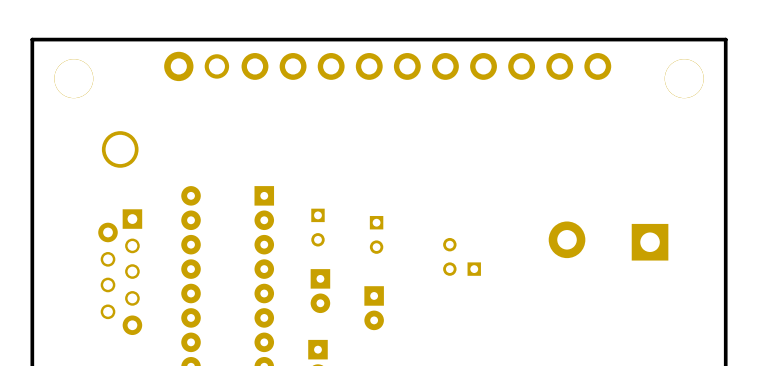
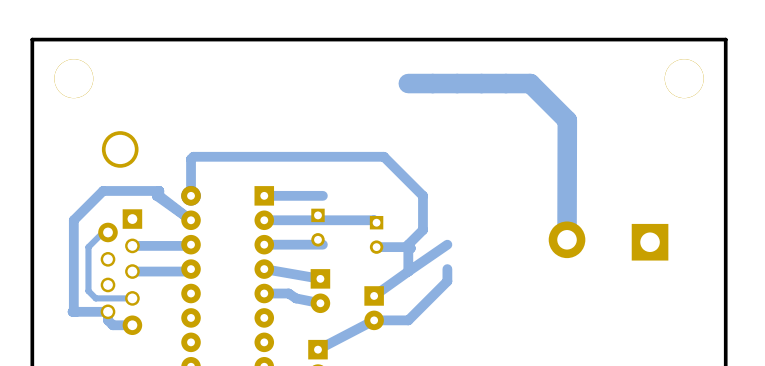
part: (387, 66) -> none
track: none -> (408, 83) (530, 83) (567, 120) (567, 239)
track: none -> (159, 190) (103, 190) (73, 220) (72, 311) (108, 311) (108, 320) (112, 325) (132, 325)
track: none -> (159, 195) (191, 220) (156, 195)
track: none -> (191, 195) (191, 159) (193, 156) (383, 156) (422, 195) (422, 230) (408, 244) (408, 271)
track: none -> (322, 195) (264, 195)
track: none -> (264, 220) (374, 220) (376, 222)
track: none -> (108, 232) (103, 232) (88, 247) (88, 291) (95, 298) (132, 298)
track: none -> (191, 244) (132, 245)
track: none -> (322, 244) (264, 244)
track: none -> (447, 244) (408, 271)
track: none -> (376, 247) (410, 248) (408, 248)
part: (462, 256) -> none
track: none -> (191, 269) (188, 271) (132, 271)
track: none -> (264, 269) (320, 278)
track: none -> (447, 269) (447, 281) (408, 320) (374, 320) (317, 349)
track: none -> (408, 271) (374, 295)
track: none -> (264, 293) (288, 293) (296, 298) (320, 303)

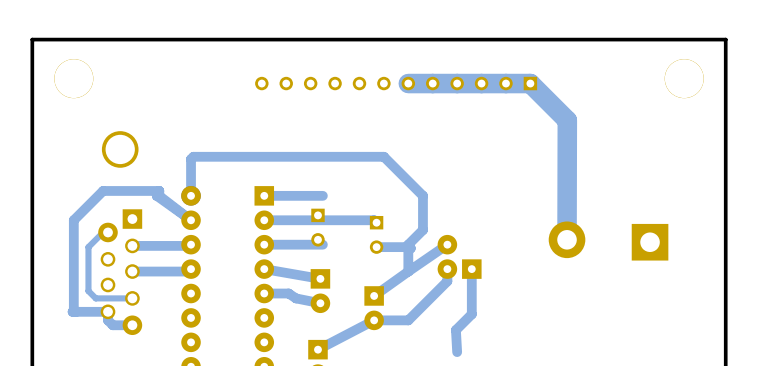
part: none -> (396, 83)
part: none -> (459, 256)
track: none -> (471, 269) (471, 314) (455, 330) (457, 352)

